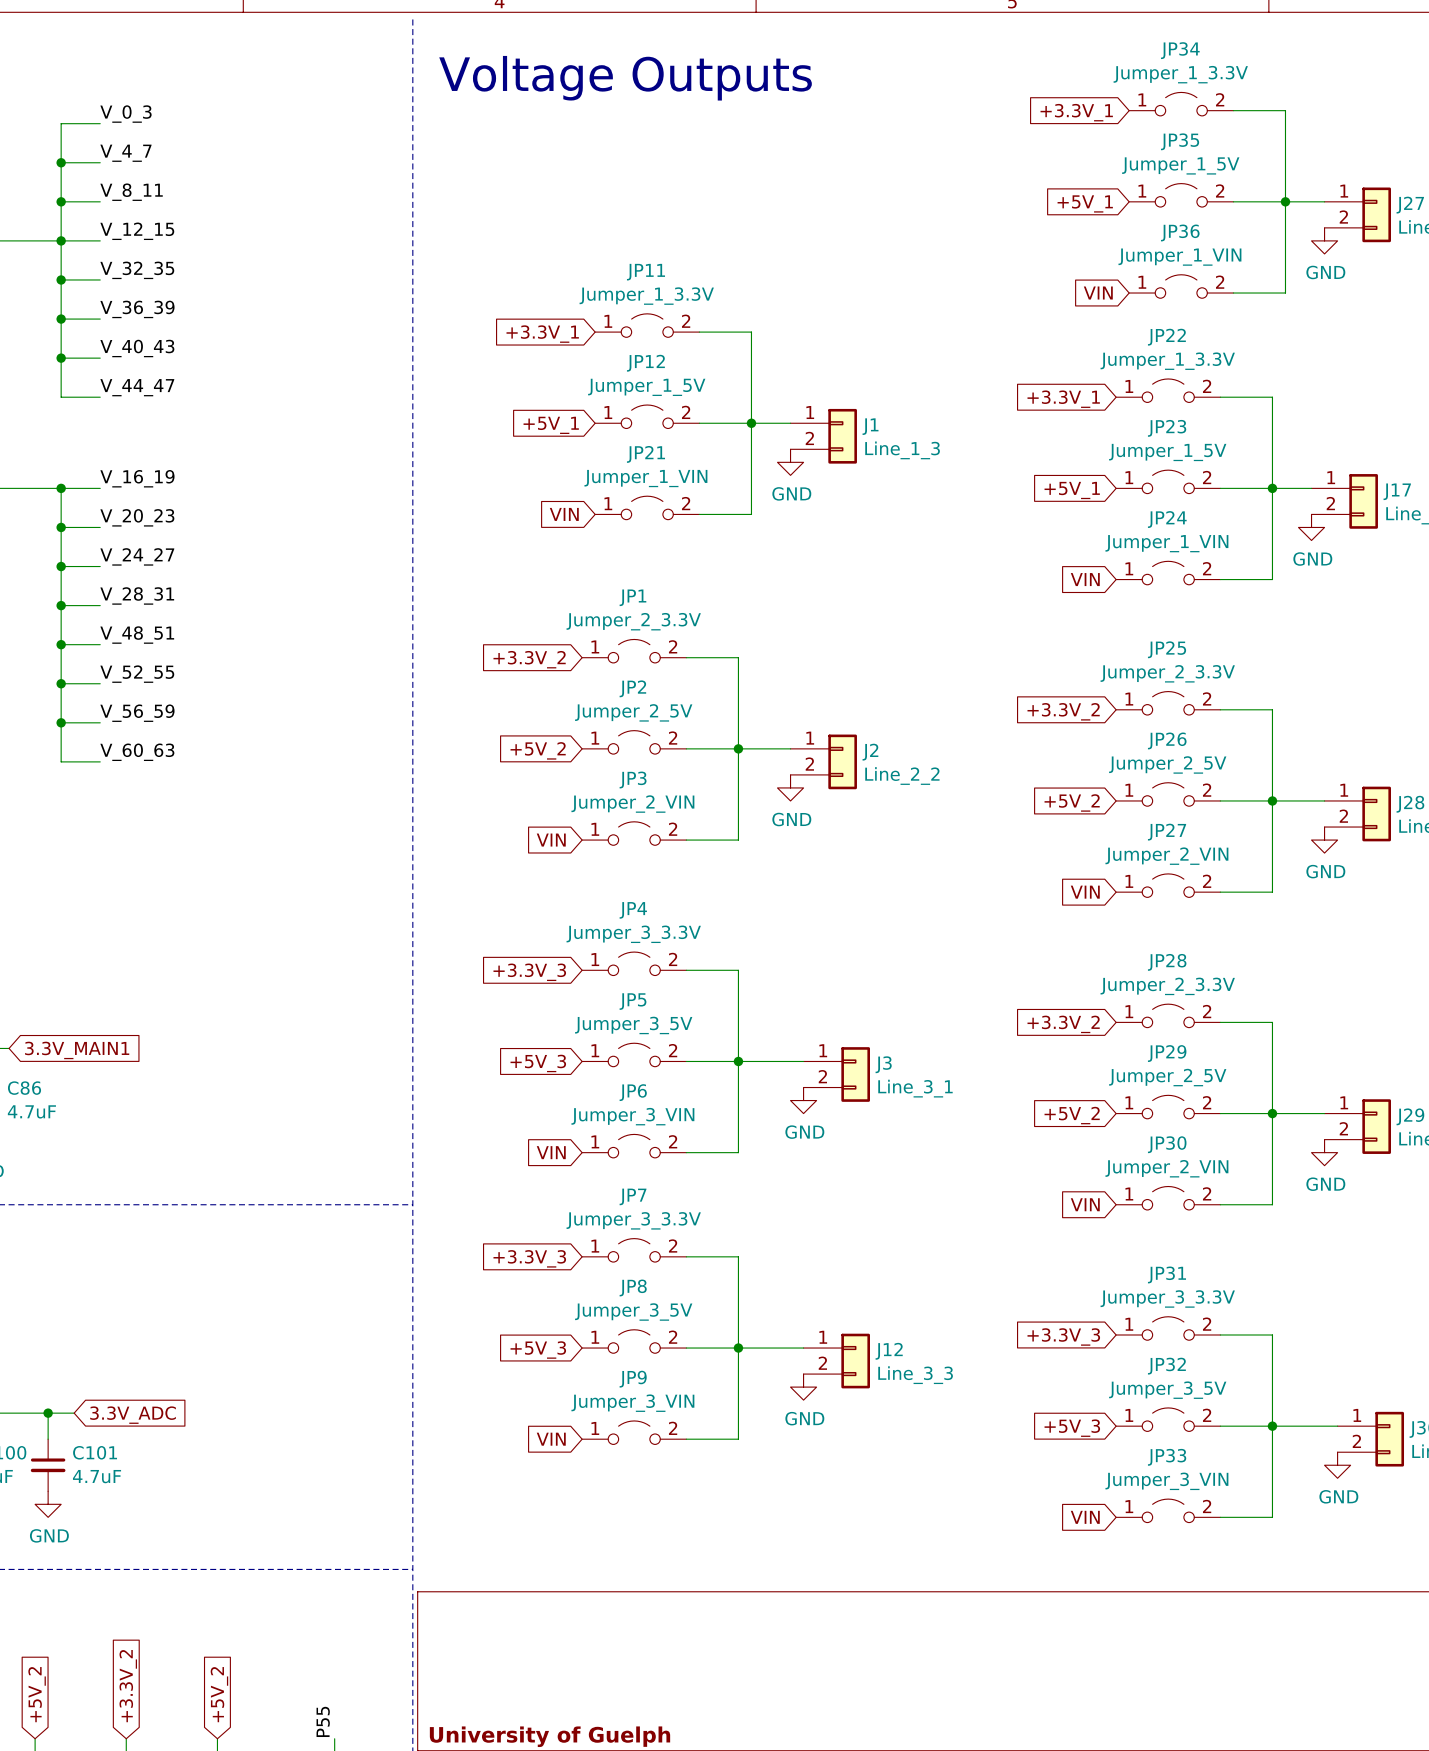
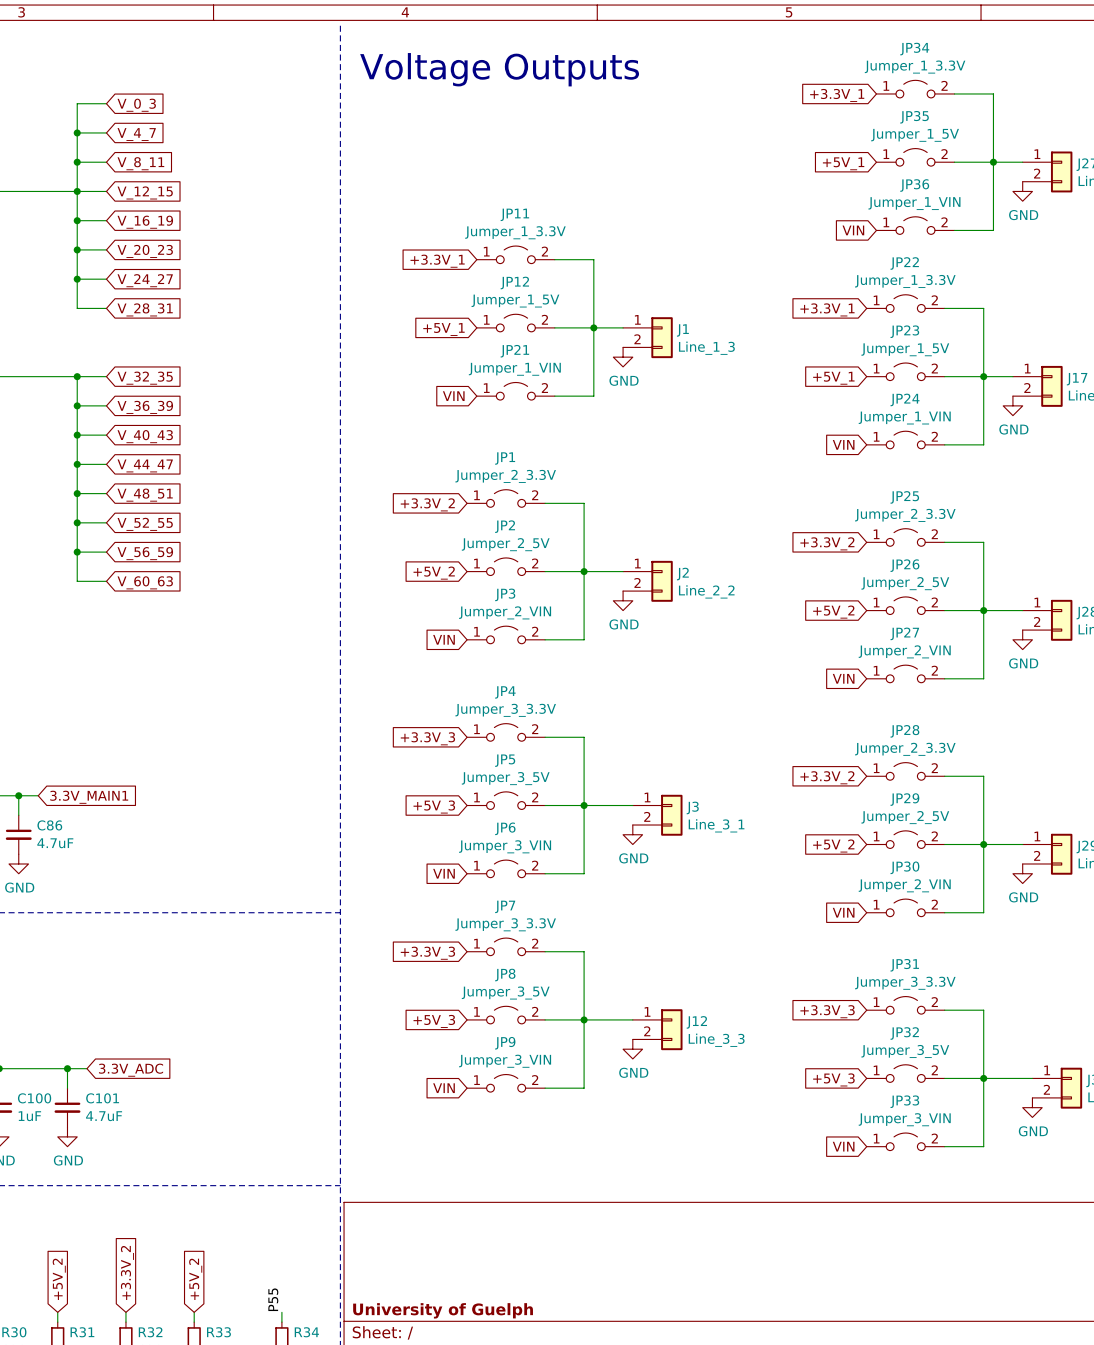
label: V_0_3 (125, 114) -> none
global label: none -> V_0_3 (136, 105)
label: V_4_7 (125, 153) -> none
global label: none -> V_4_7 (136, 134)
label: V_8_11 (131, 192) -> none
global label: none -> V_8_11 (140, 163)
label: V_12_15 (137, 231) -> none
global label: none -> V_12_15 (145, 192)
label: V_32_35 (137, 270) -> none
global label: none -> V_16_19 (145, 222)
label: V_36_39 (137, 309) -> none
global label: none -> V_20_23 (145, 251)
label: V_40_43 (137, 348) -> none
global label: none -> V_24_27 (145, 280)
label: V_44_47 (137, 387) -> none
global label: none -> V_28_31 (145, 309)
label: V_16_19 (137, 478) -> none
global label: none -> V_32_35 (145, 378)
label: V_20_23 (137, 517) -> none
global label: none -> V_36_39 (145, 407)
label: V_24_27 (137, 556) -> none
global label: none -> V_40_43 (145, 436)
label: V_28_31 (137, 595) -> none
global label: none -> V_44_47 (145, 465)
label: V_48_51 (137, 635) -> none
global label: none -> V_48_51 (145, 495)
label: V_52_55 (137, 674) -> none
global label: none -> V_52_55 (145, 524)
label: V_56_59 (137, 713) -> none
global label: none -> V_56_59 (145, 553)
label: V_60_63 (137, 752) -> none
global label: none -> V_60_63 (145, 582)

